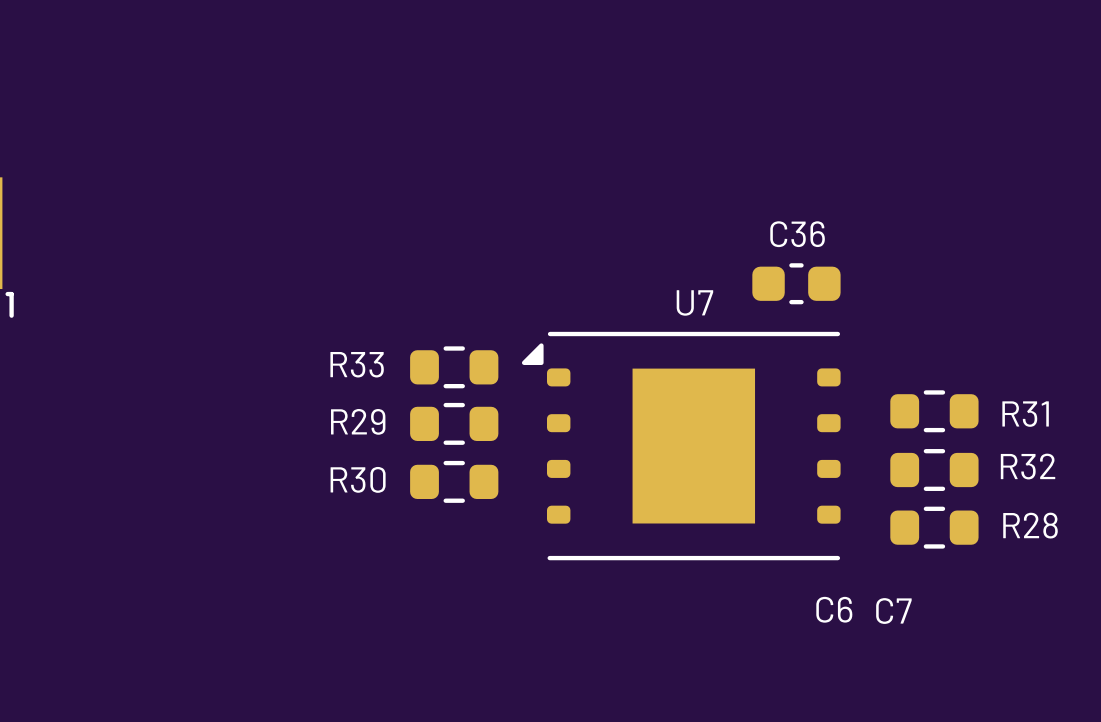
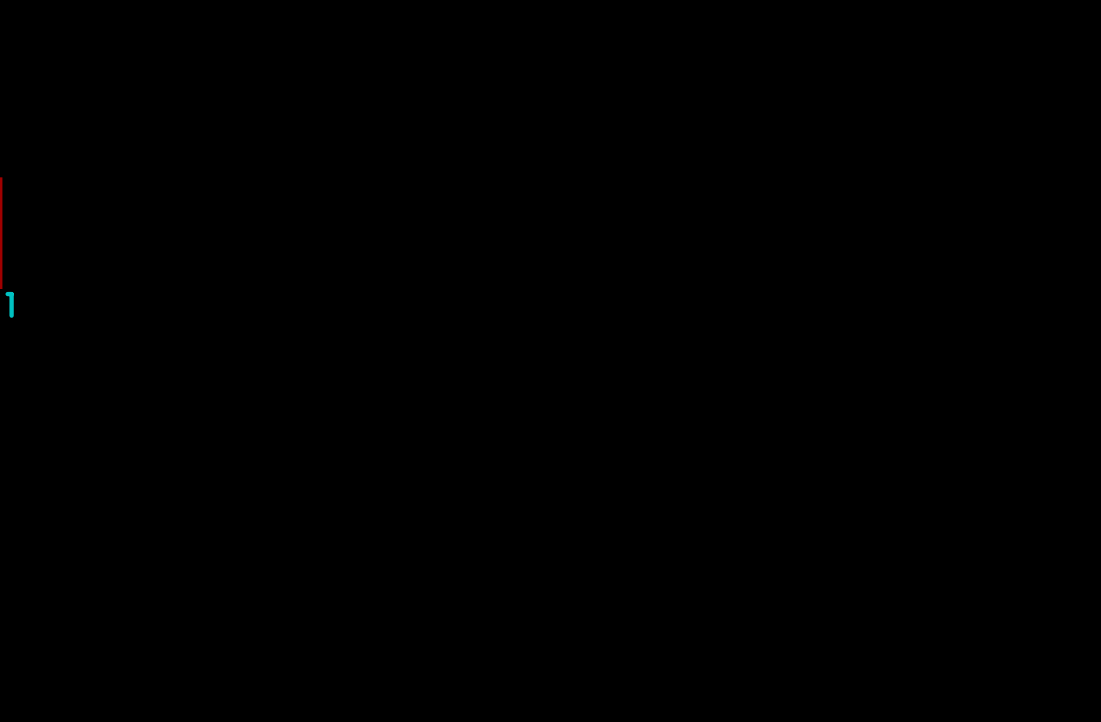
C36: (796, 283) -> none
R33: (454, 367) -> none
R31: (934, 411) -> none
R29: (454, 423) -> none
U7: (681, 446) -> none
R32: (934, 470) -> none
R30: (454, 481) -> none
R28: (934, 527) -> none
C6: (834, 609) -> none
C7: (893, 611) -> none

